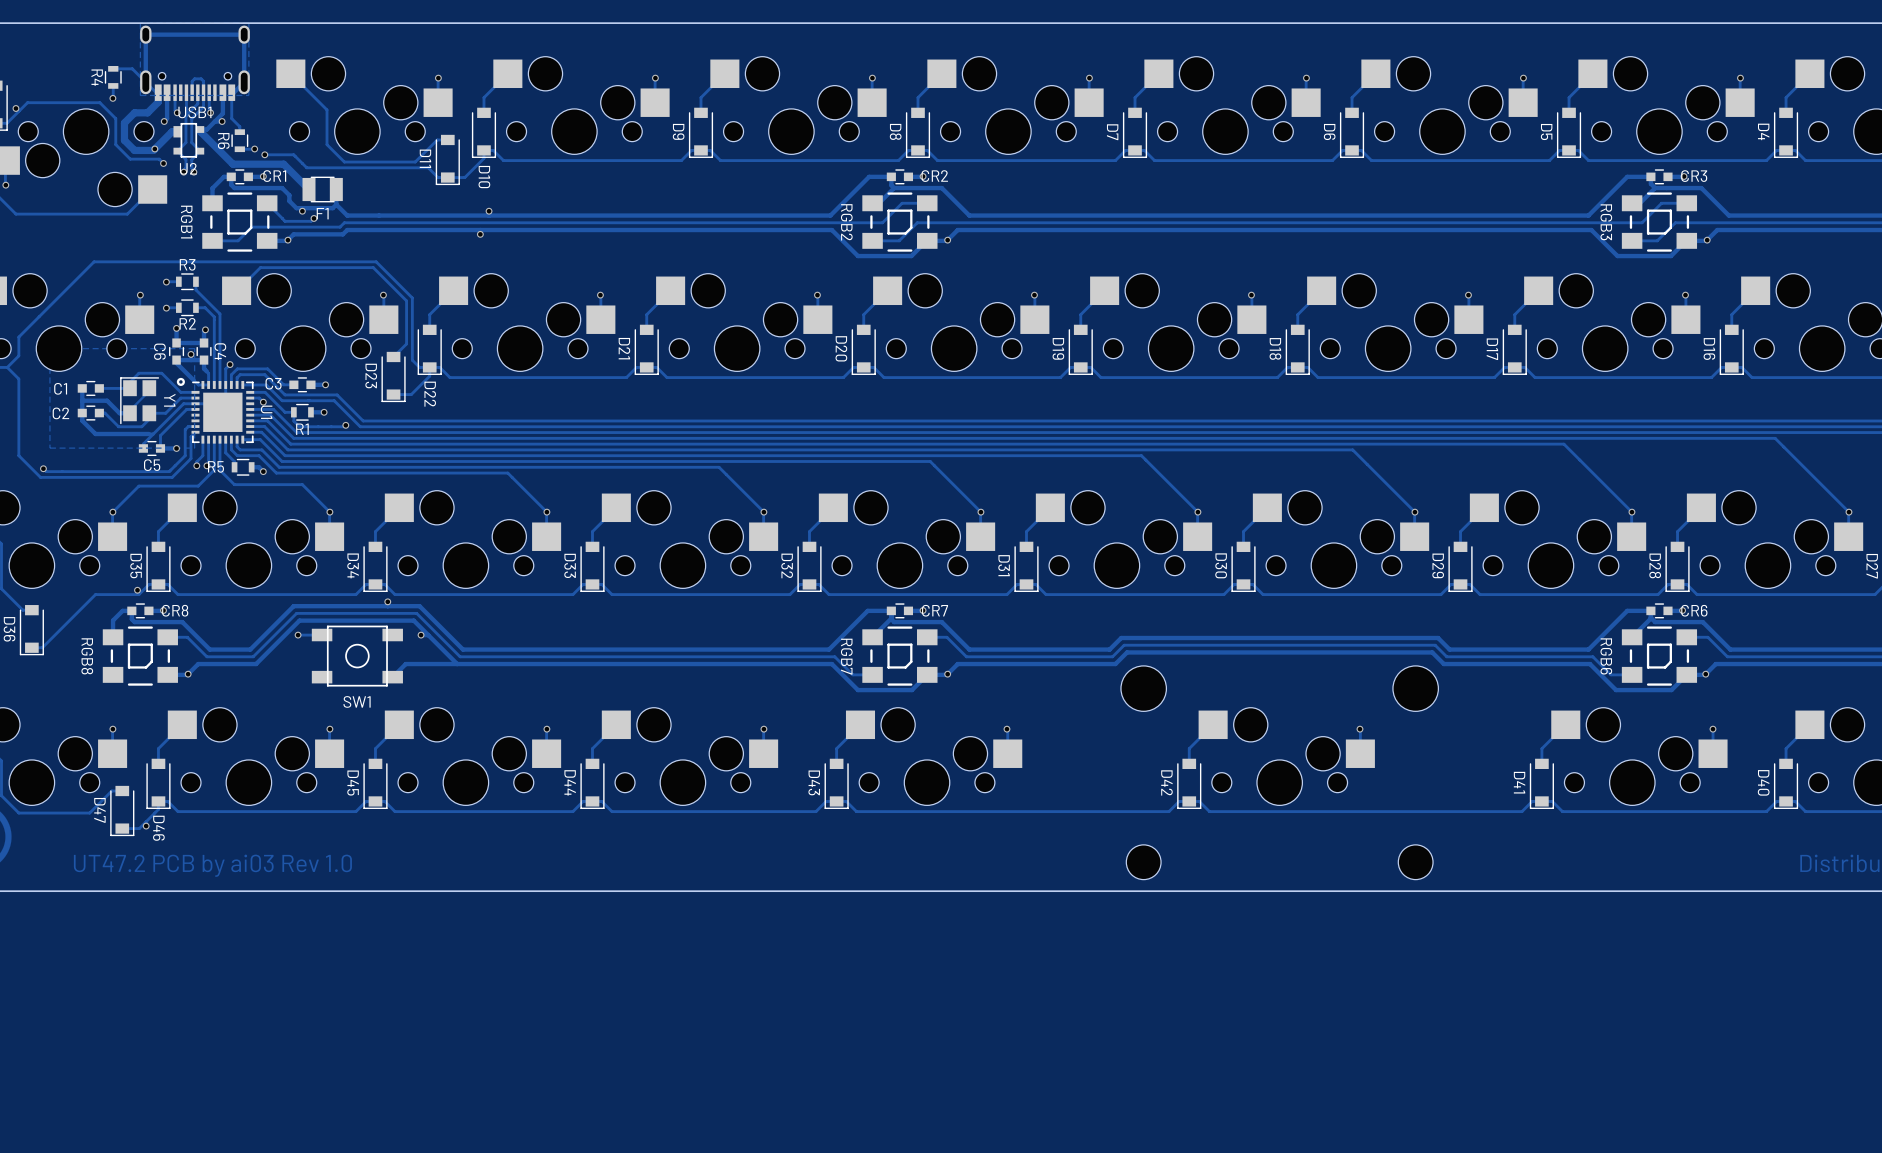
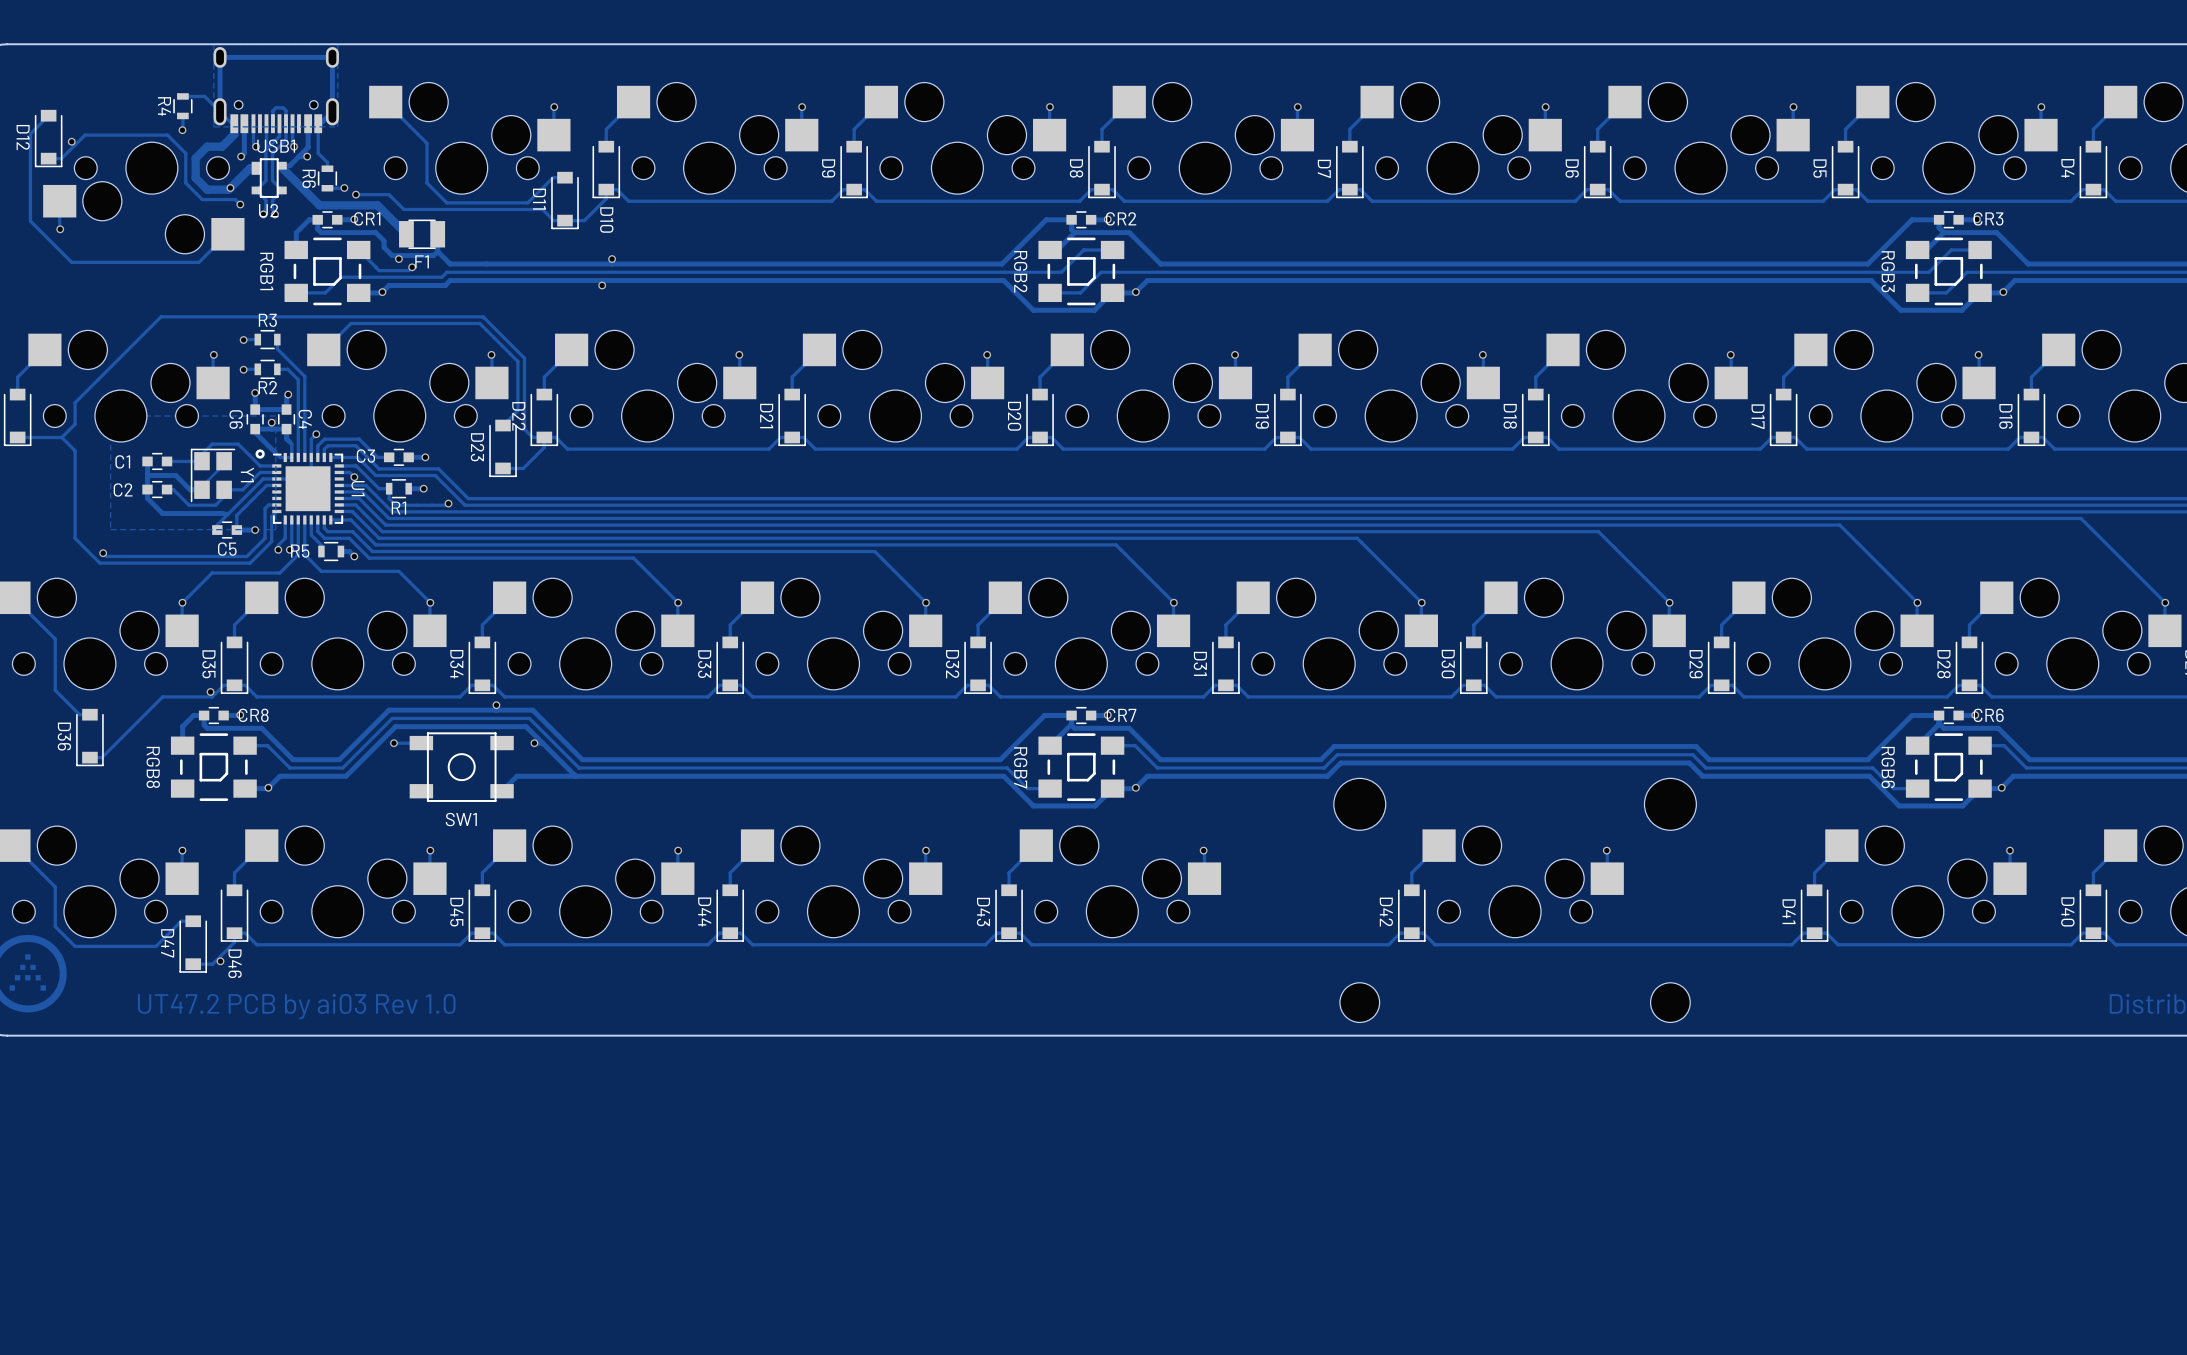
D22 name position: D22 (430, 394) -> D22 (518, 416)

